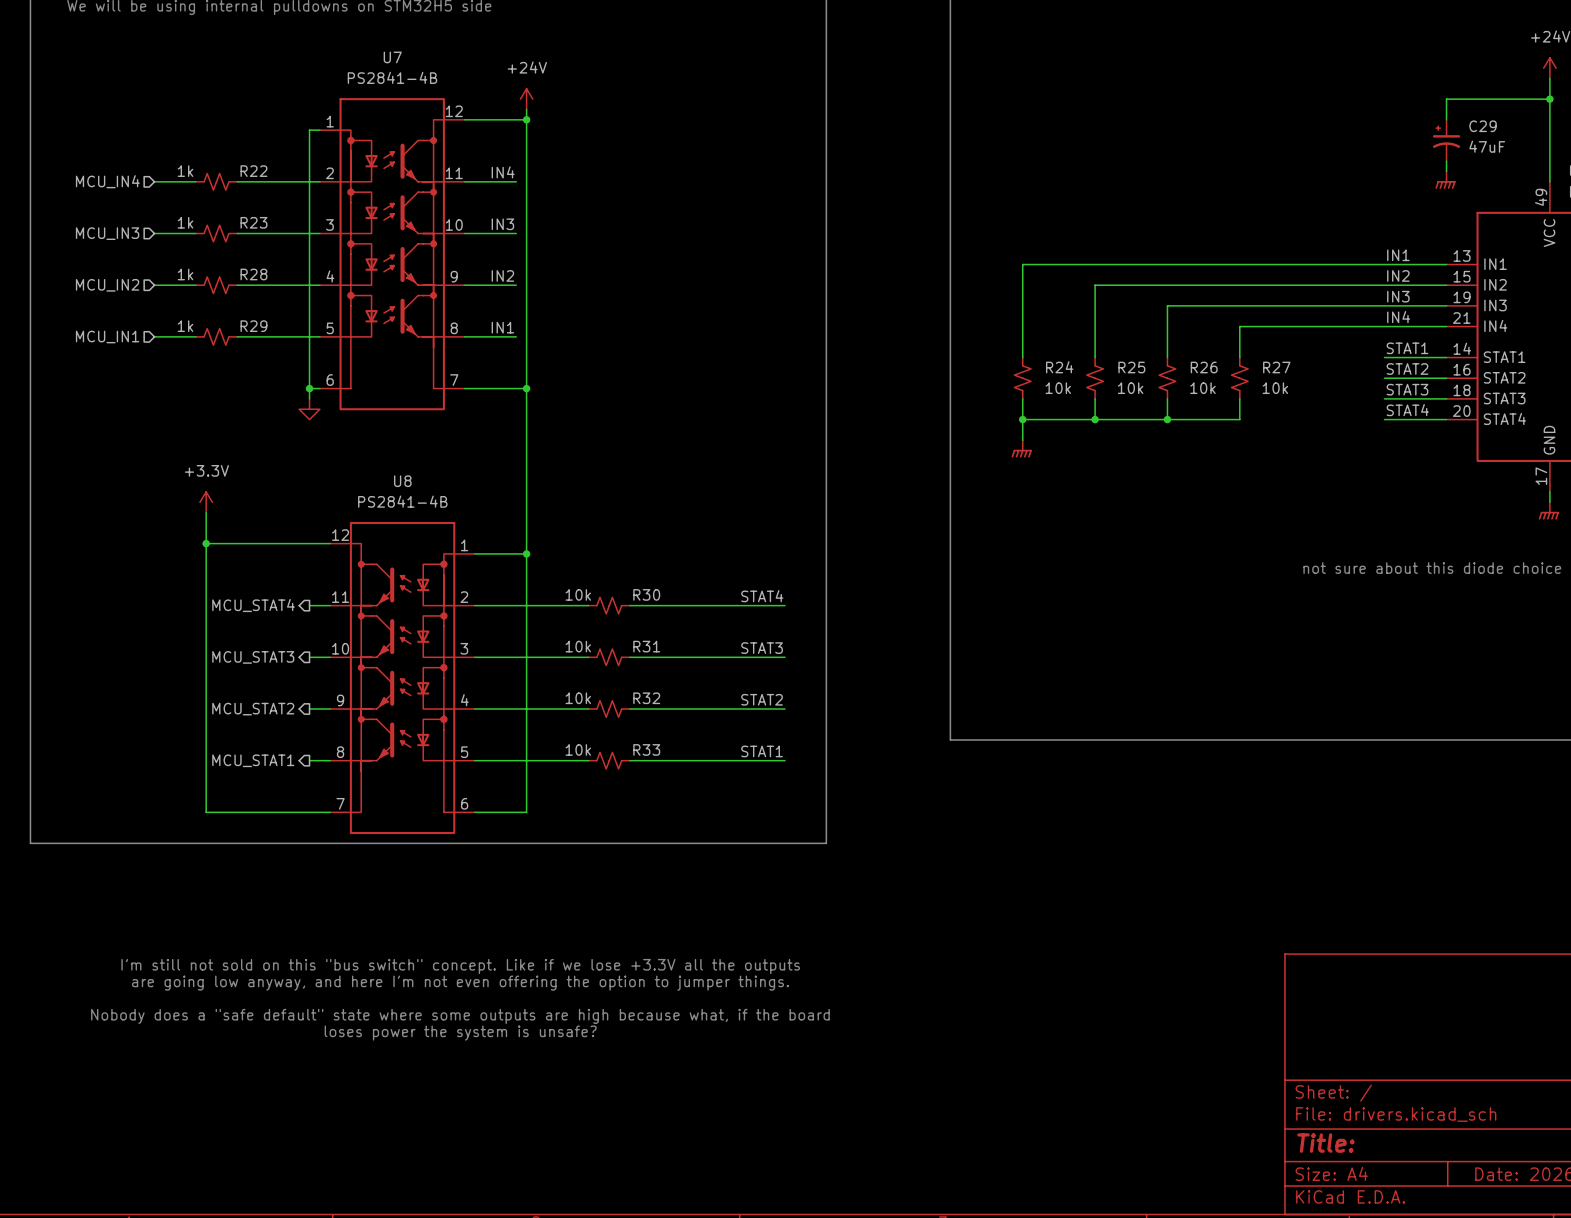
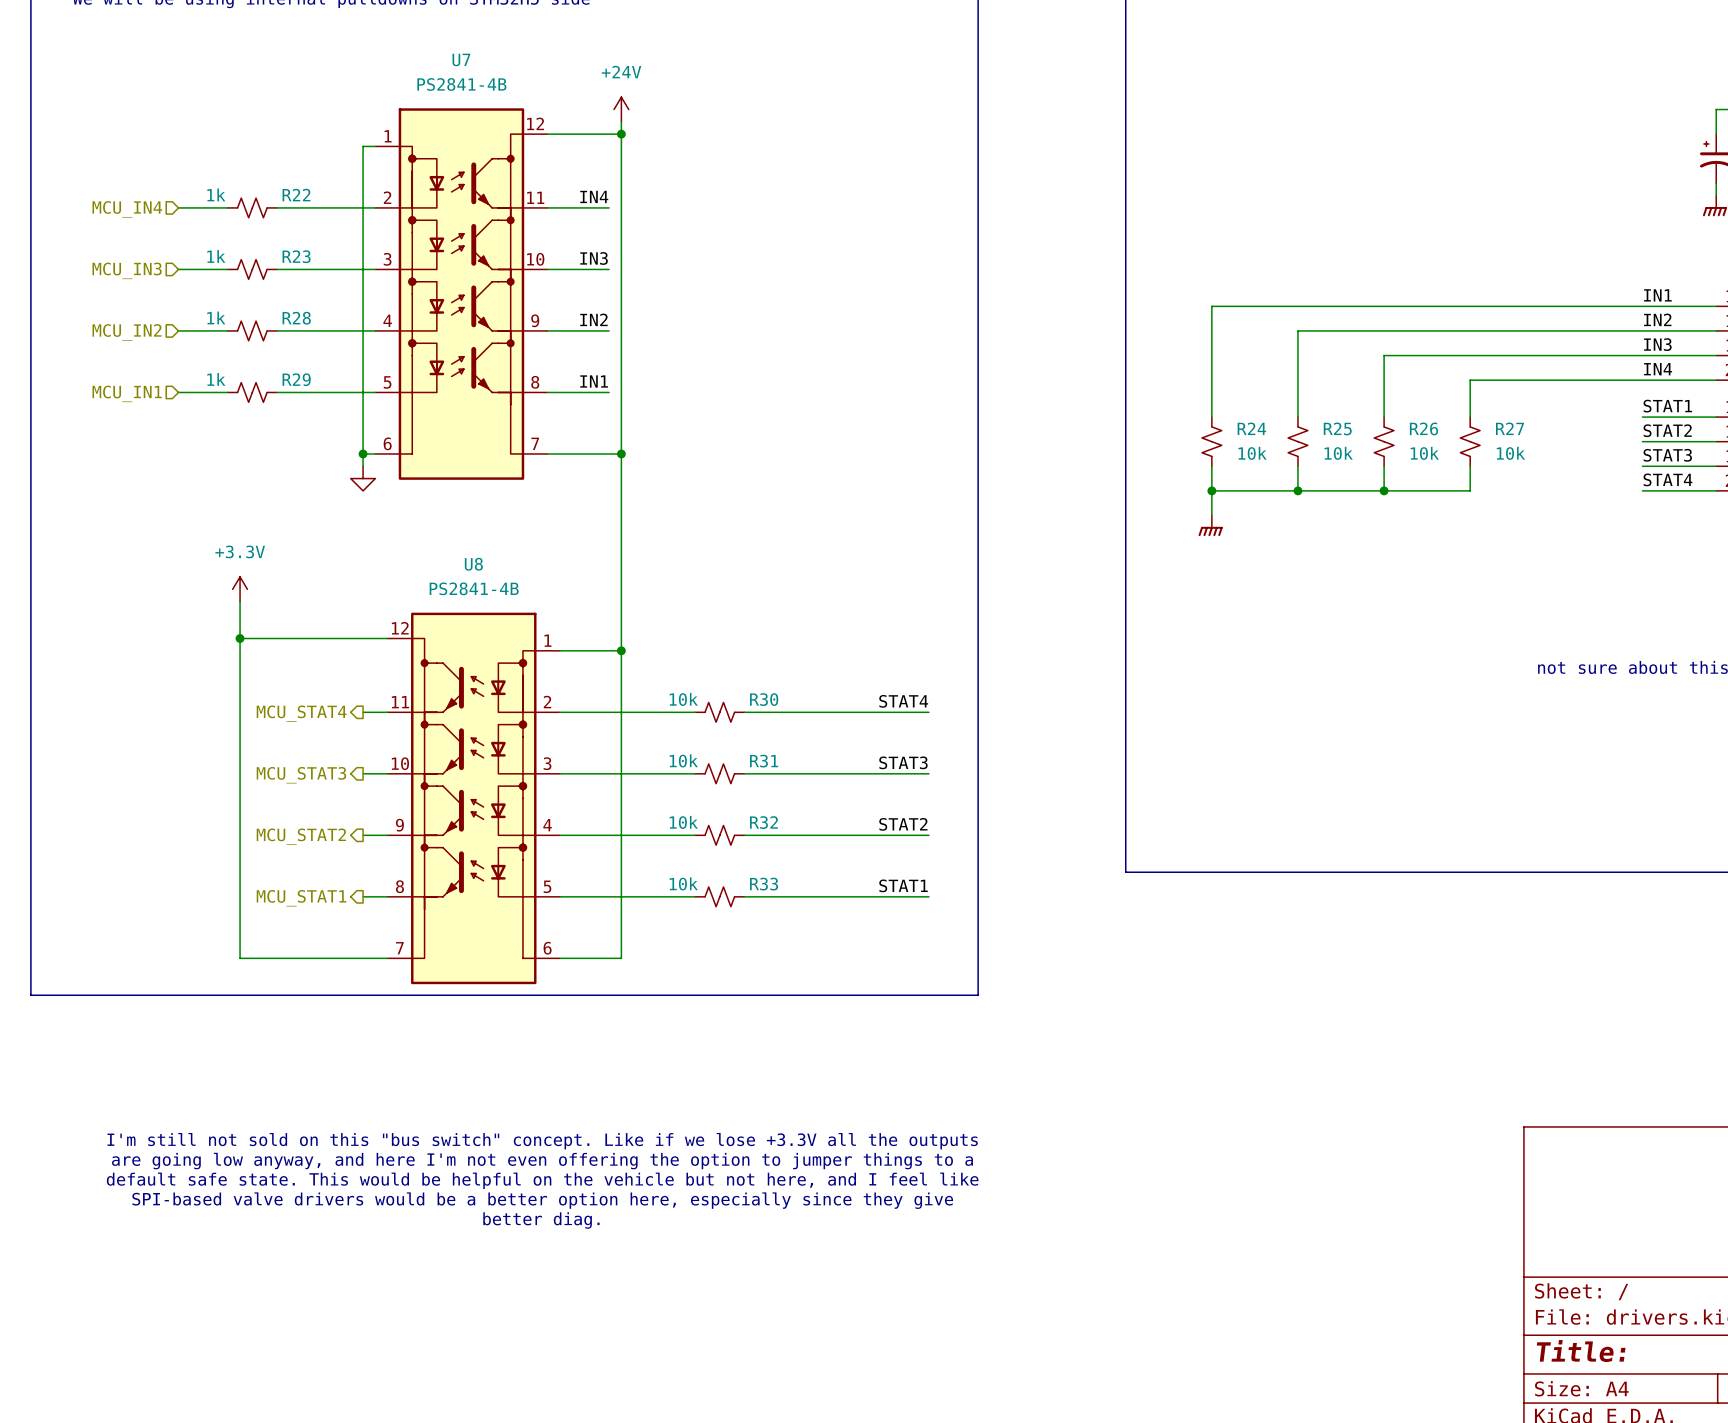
text: are going low anyway, and here I'm not even offering the option to jumper things. (460, 983) -> are going low anyway, and here I'm not even offering the option to jumper things to a (542, 1161)
text: none -> default safe state. This would be helpful on the vehicle but not here, and I feel like (542, 1180)
text: Nobody does a "safe default" state where some outputs are high because what, if the board (460, 1016) -> SPI-based valve drivers would be a better option here, especially since they give (542, 1200)
text: loses power the system is unsafe? (460, 1033) -> better diag. (541, 1220)

